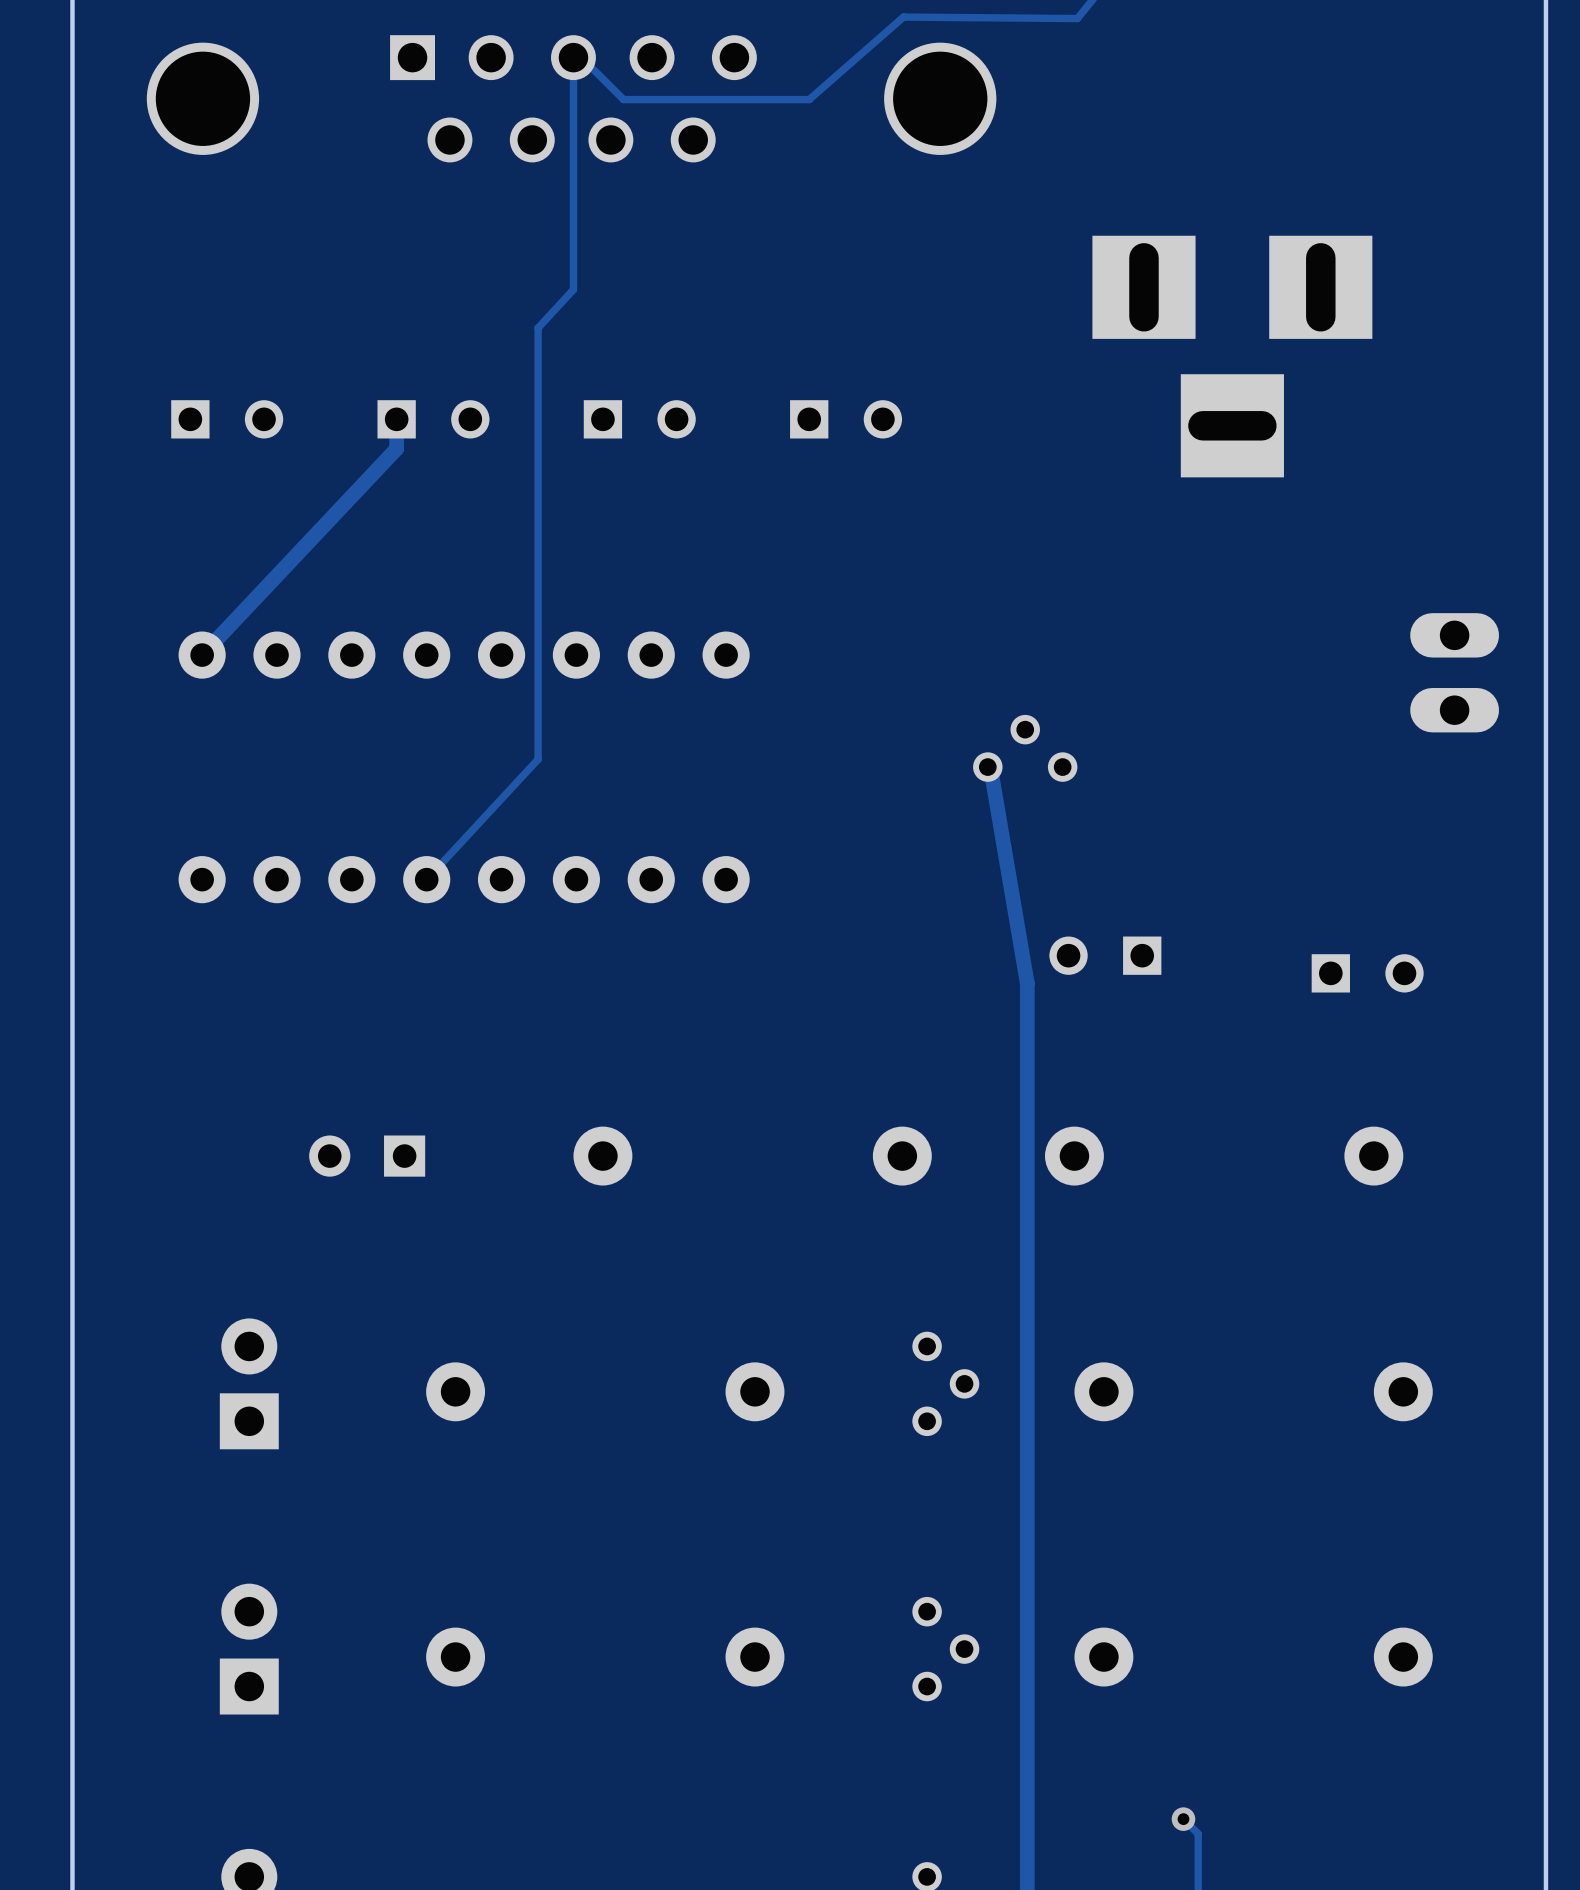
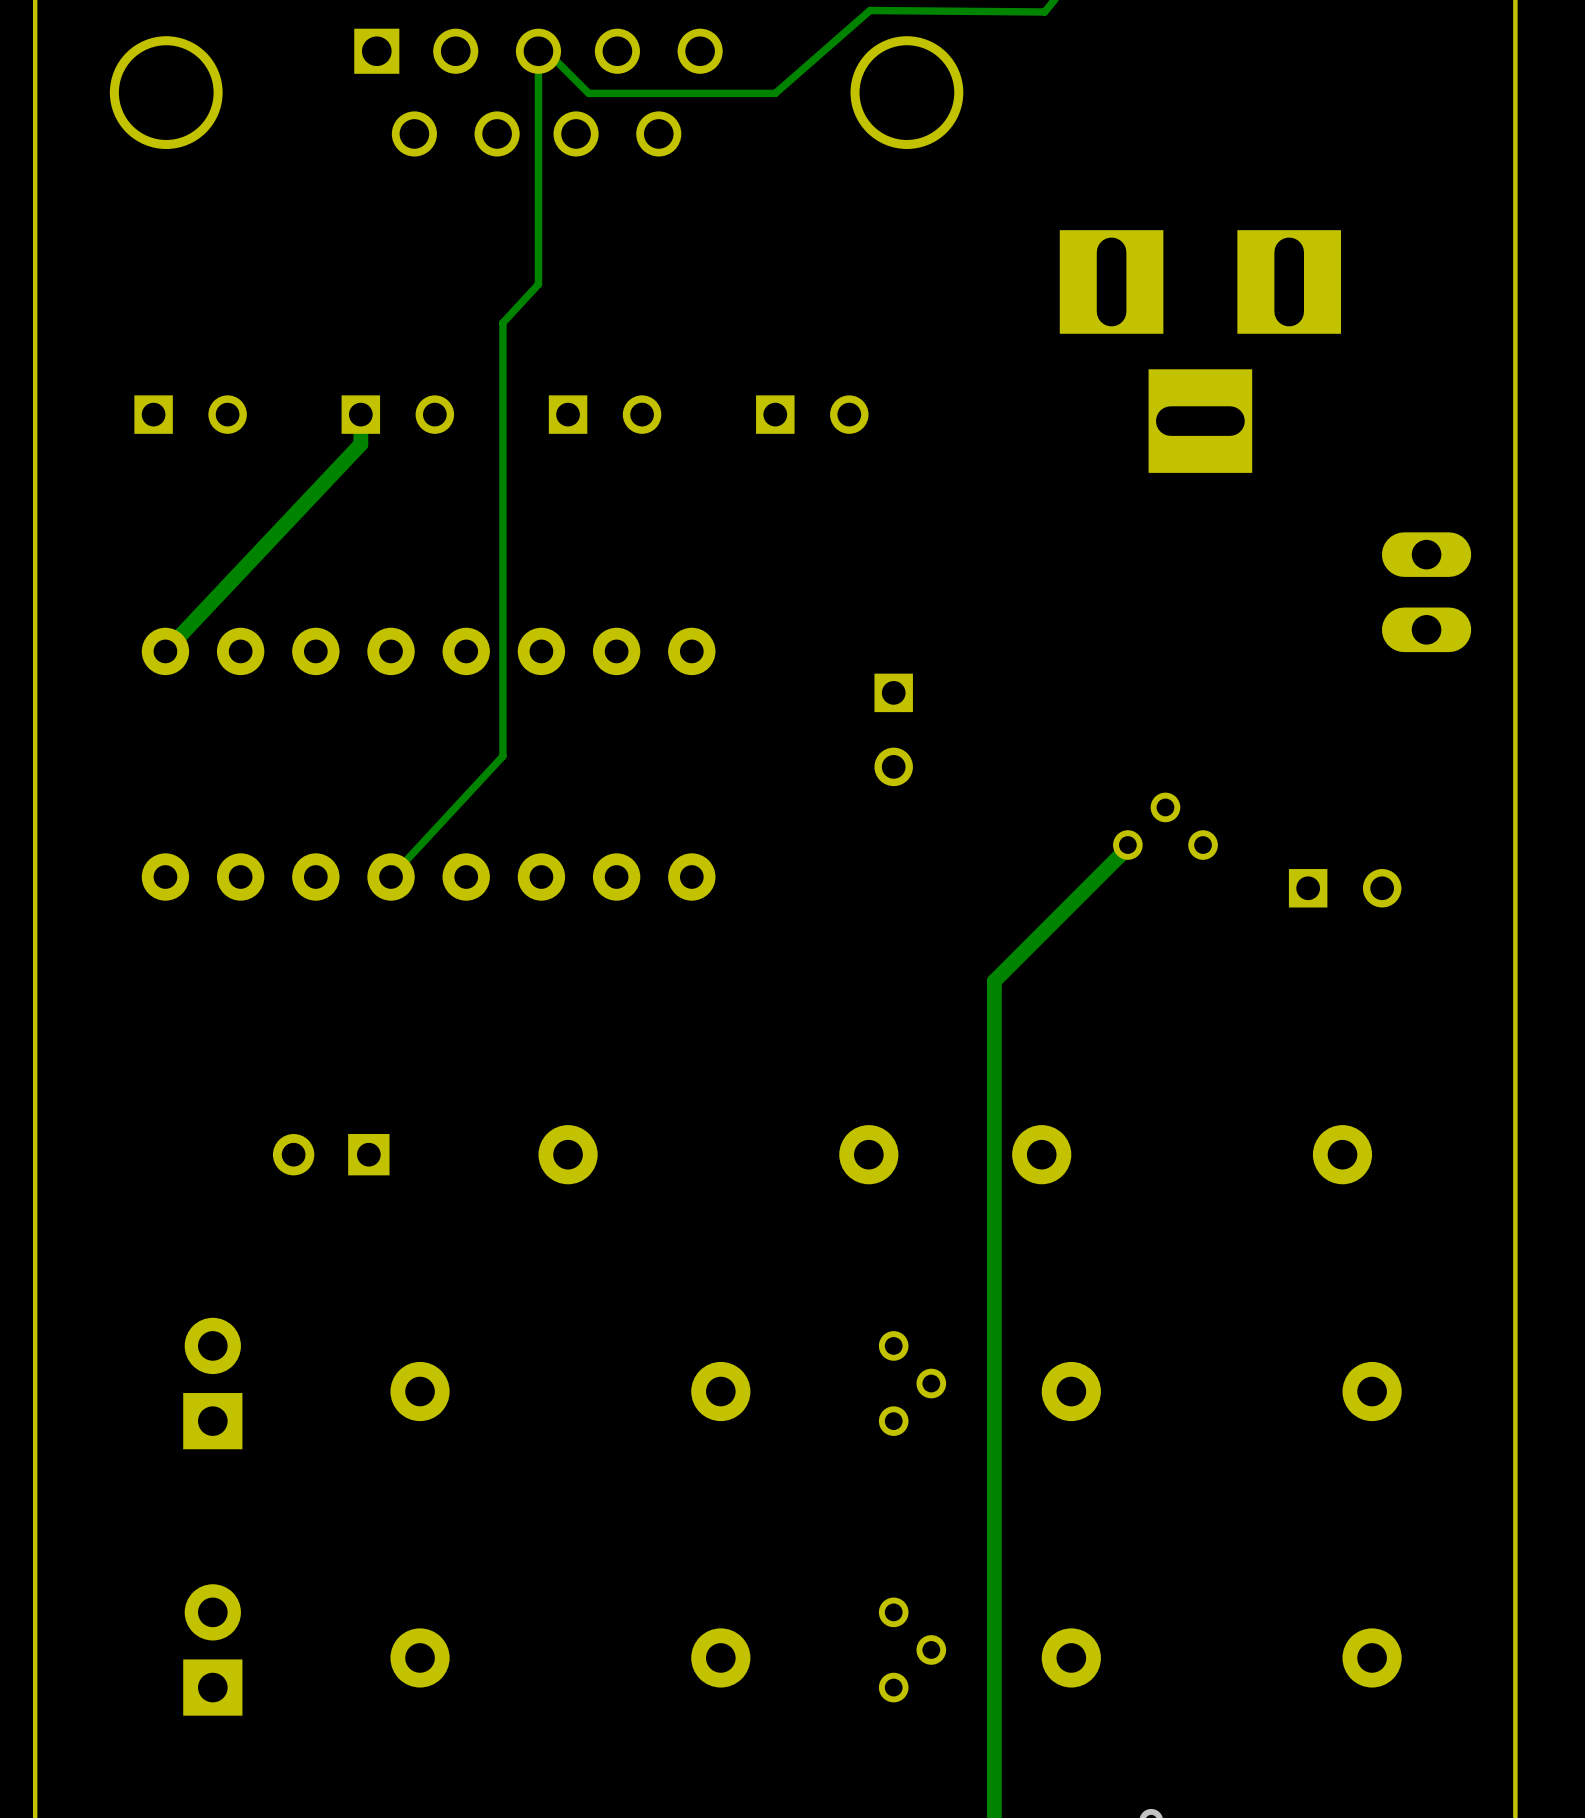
part position: (1454, 672) -> (1426, 592)
part: none -> (893, 729)
part position: (1025, 748) -> (1165, 826)
track: (990, 767) (1027, 983) -> (1130, 845) (994, 981)
part: (1105, 955) -> none
part position: (1367, 973) -> (1345, 888)

